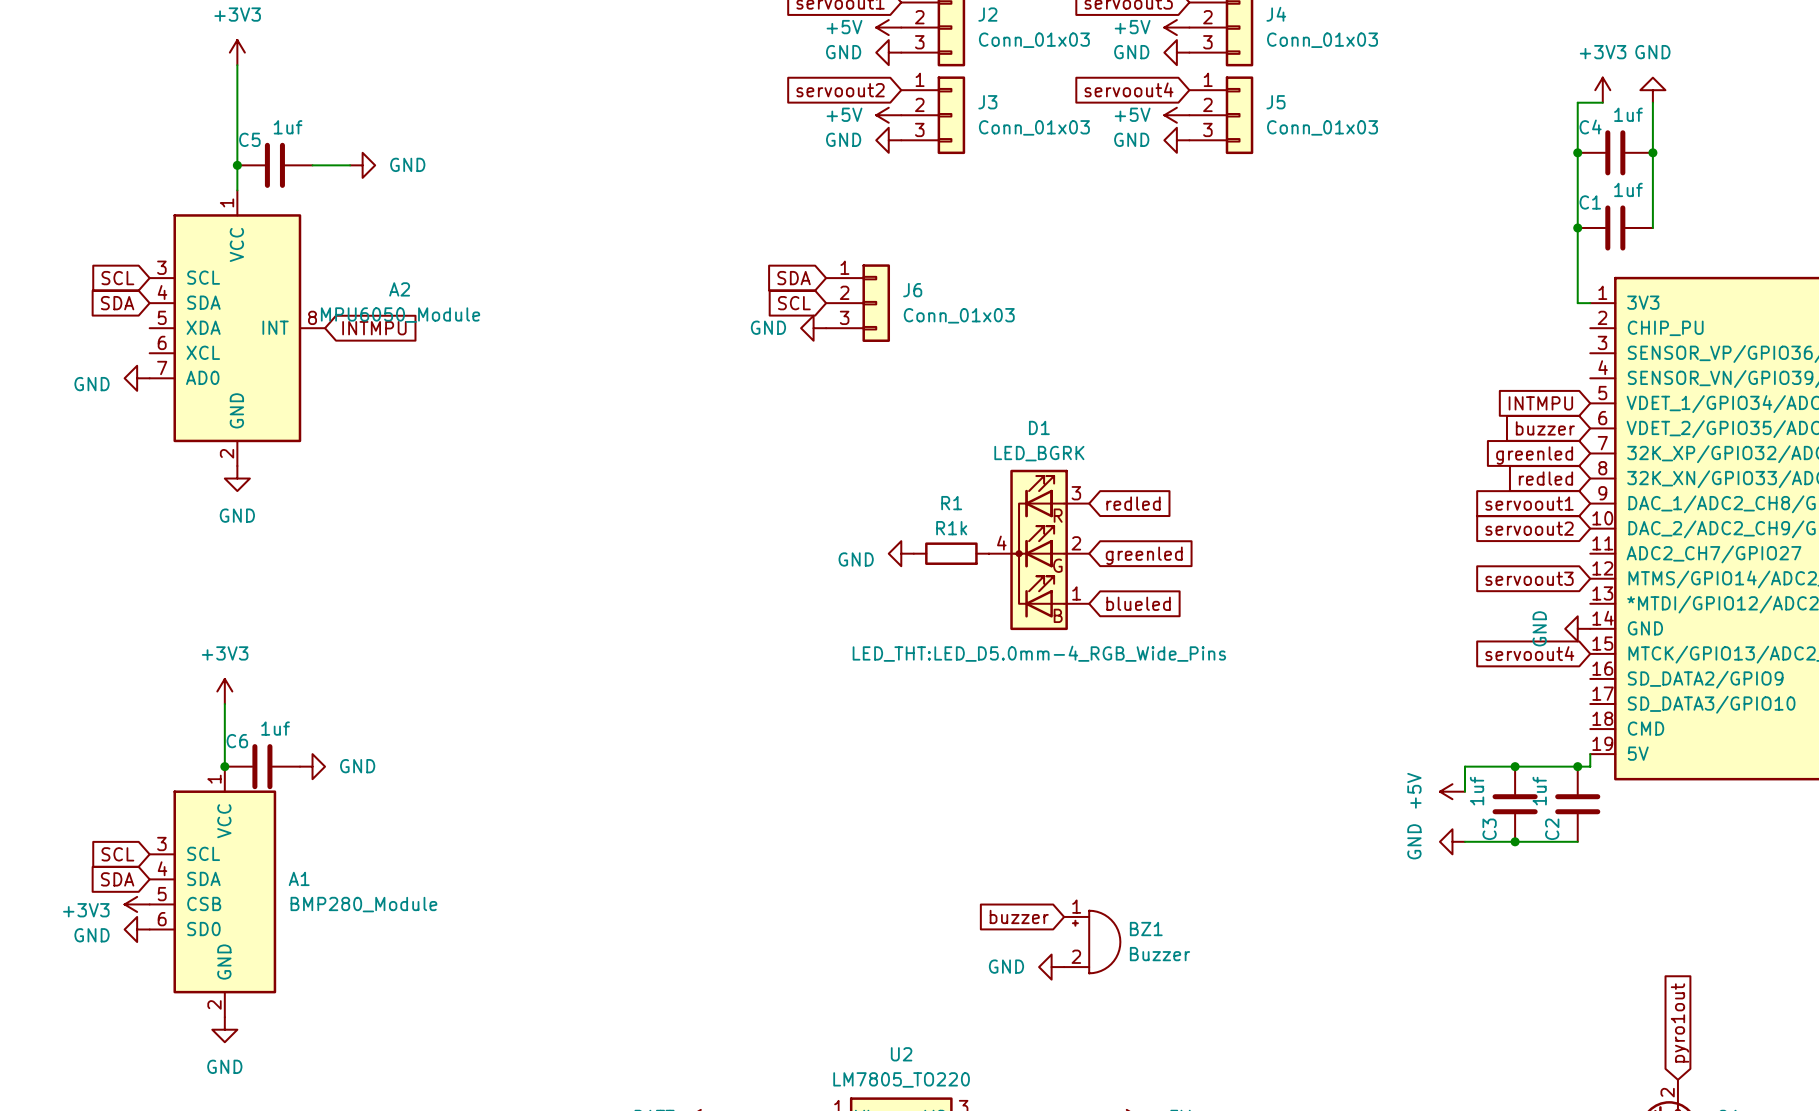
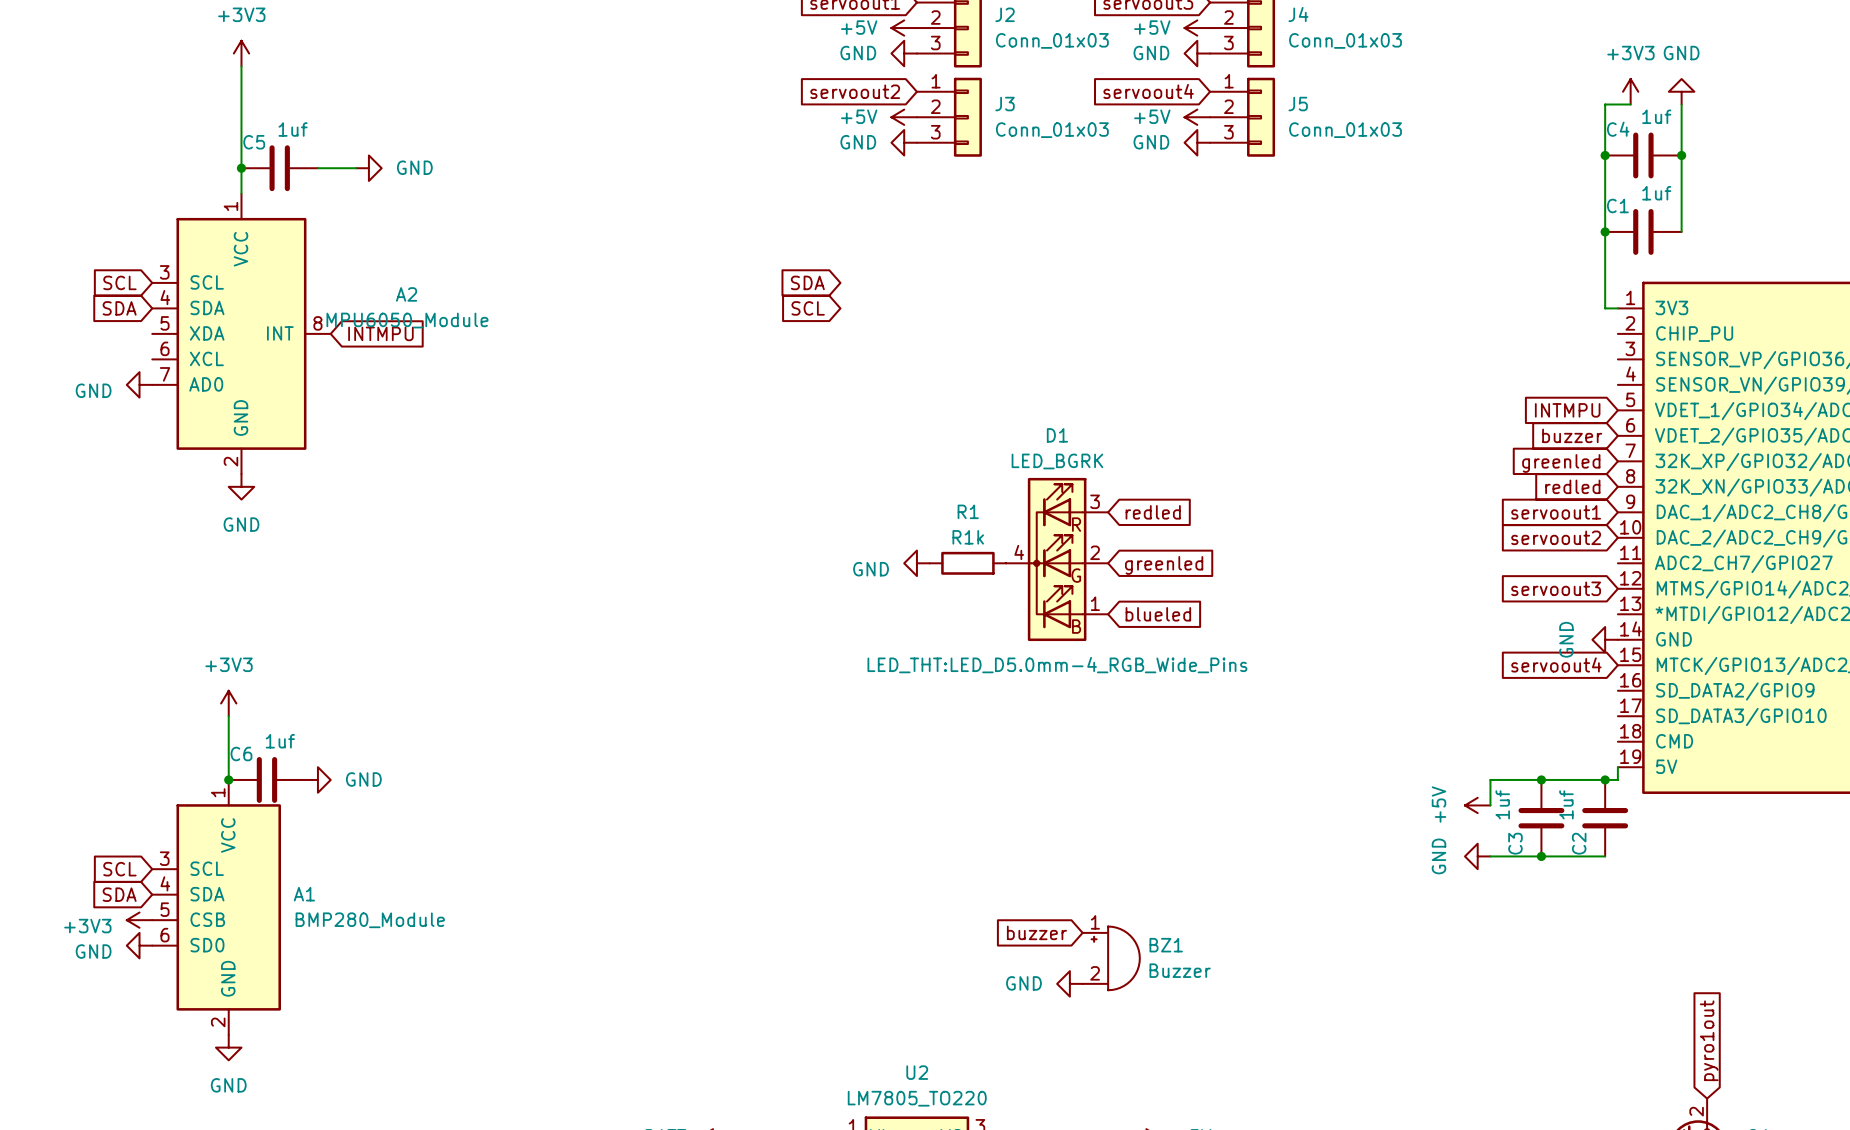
J6: Conn_01x03 (858, 303) -> none
power symbol: GND (813, 328) -> none

